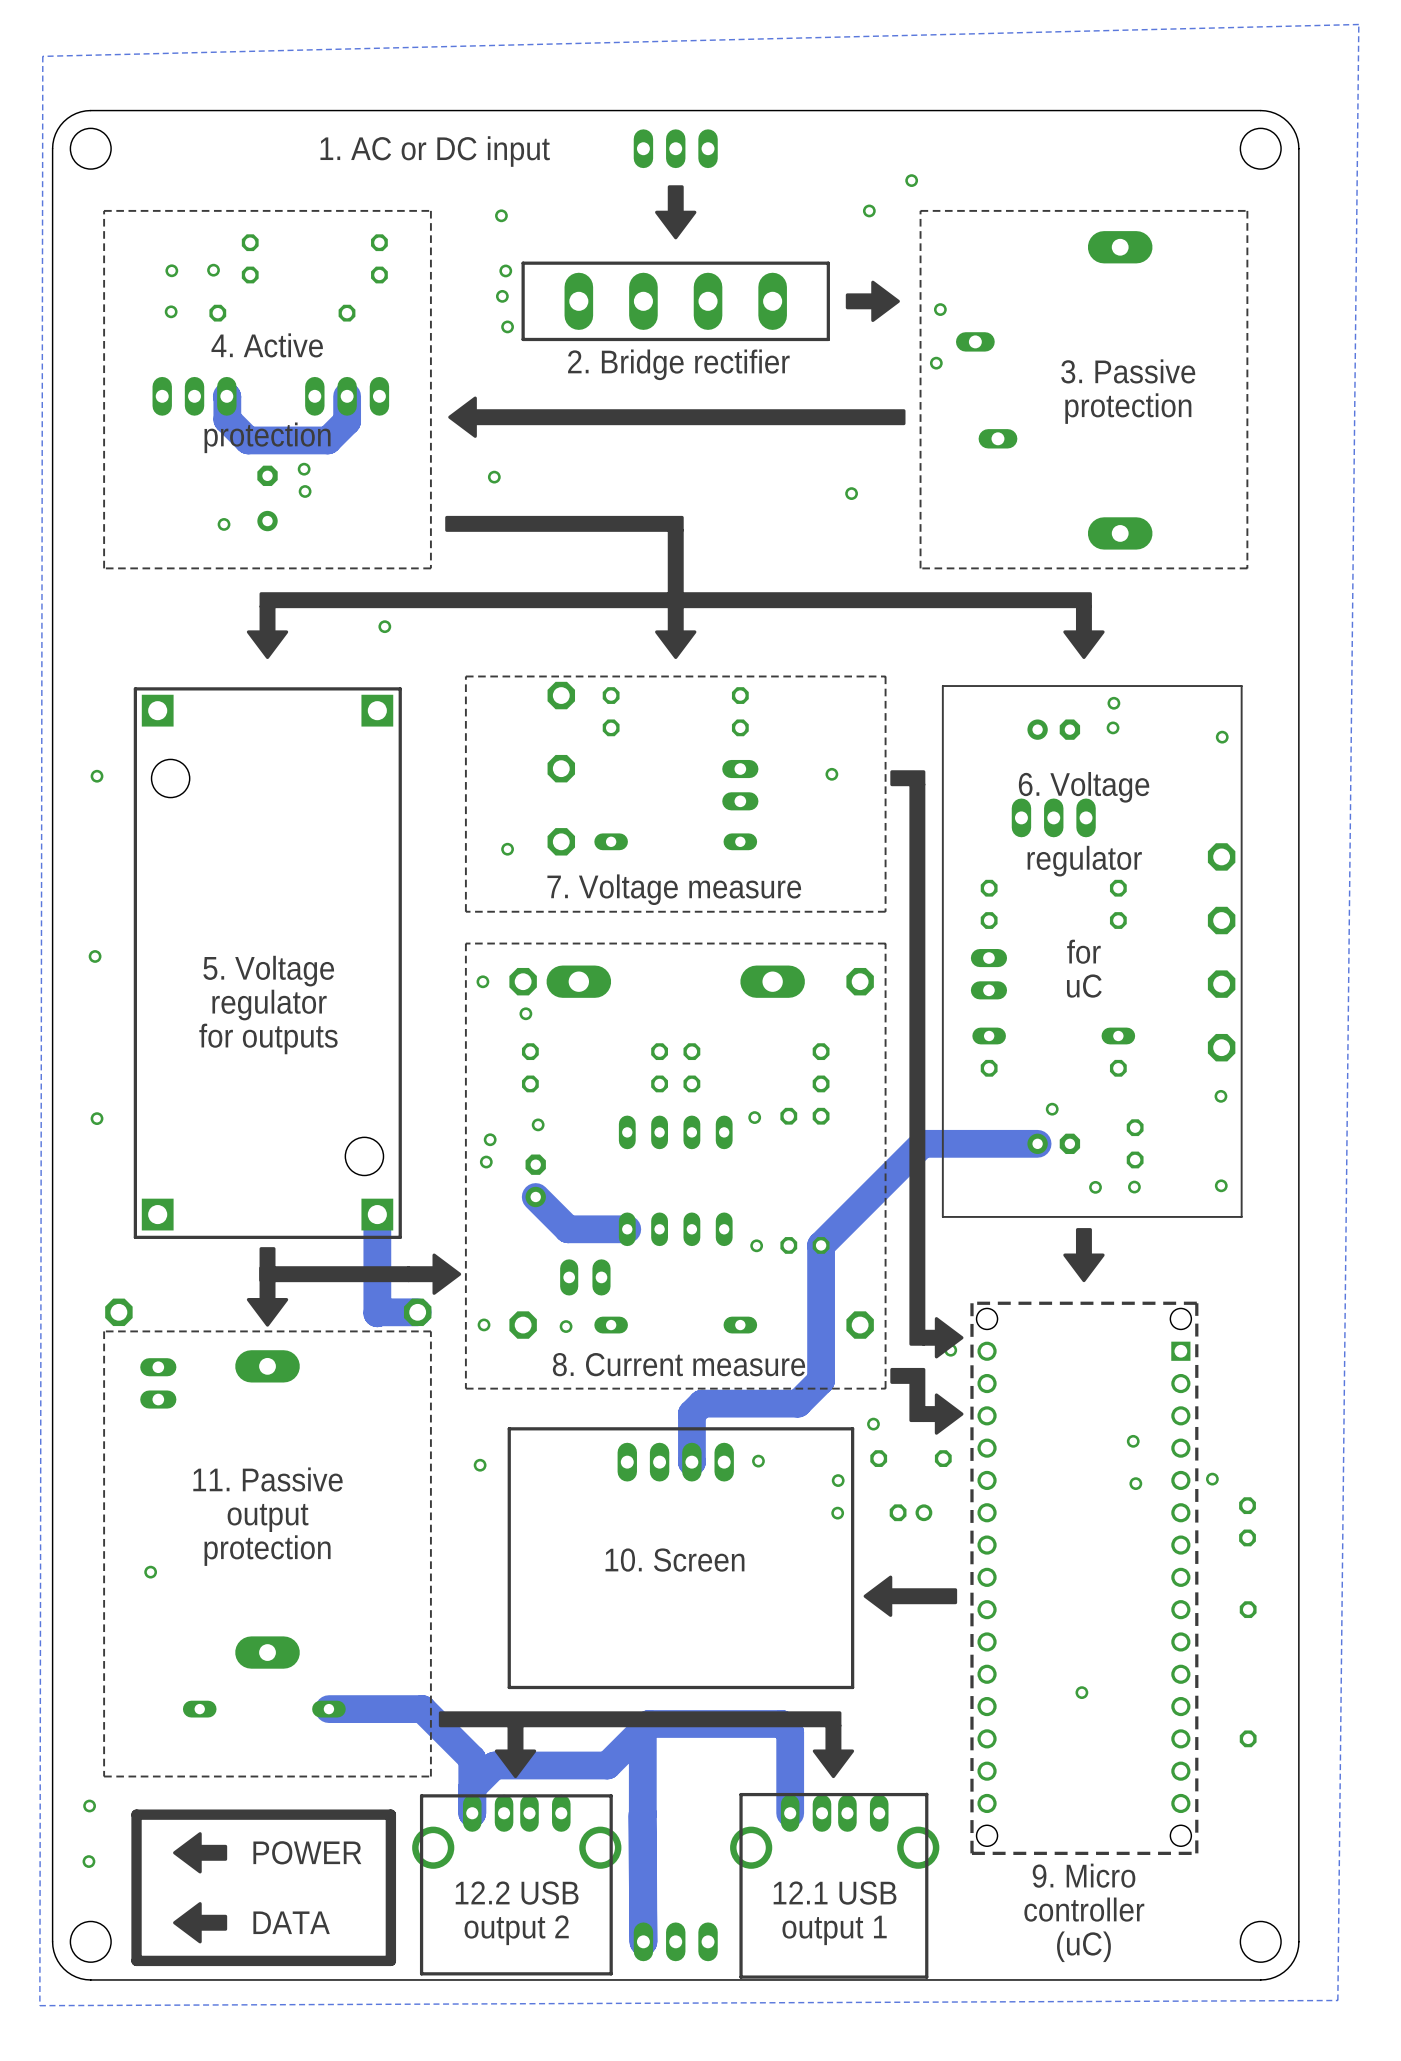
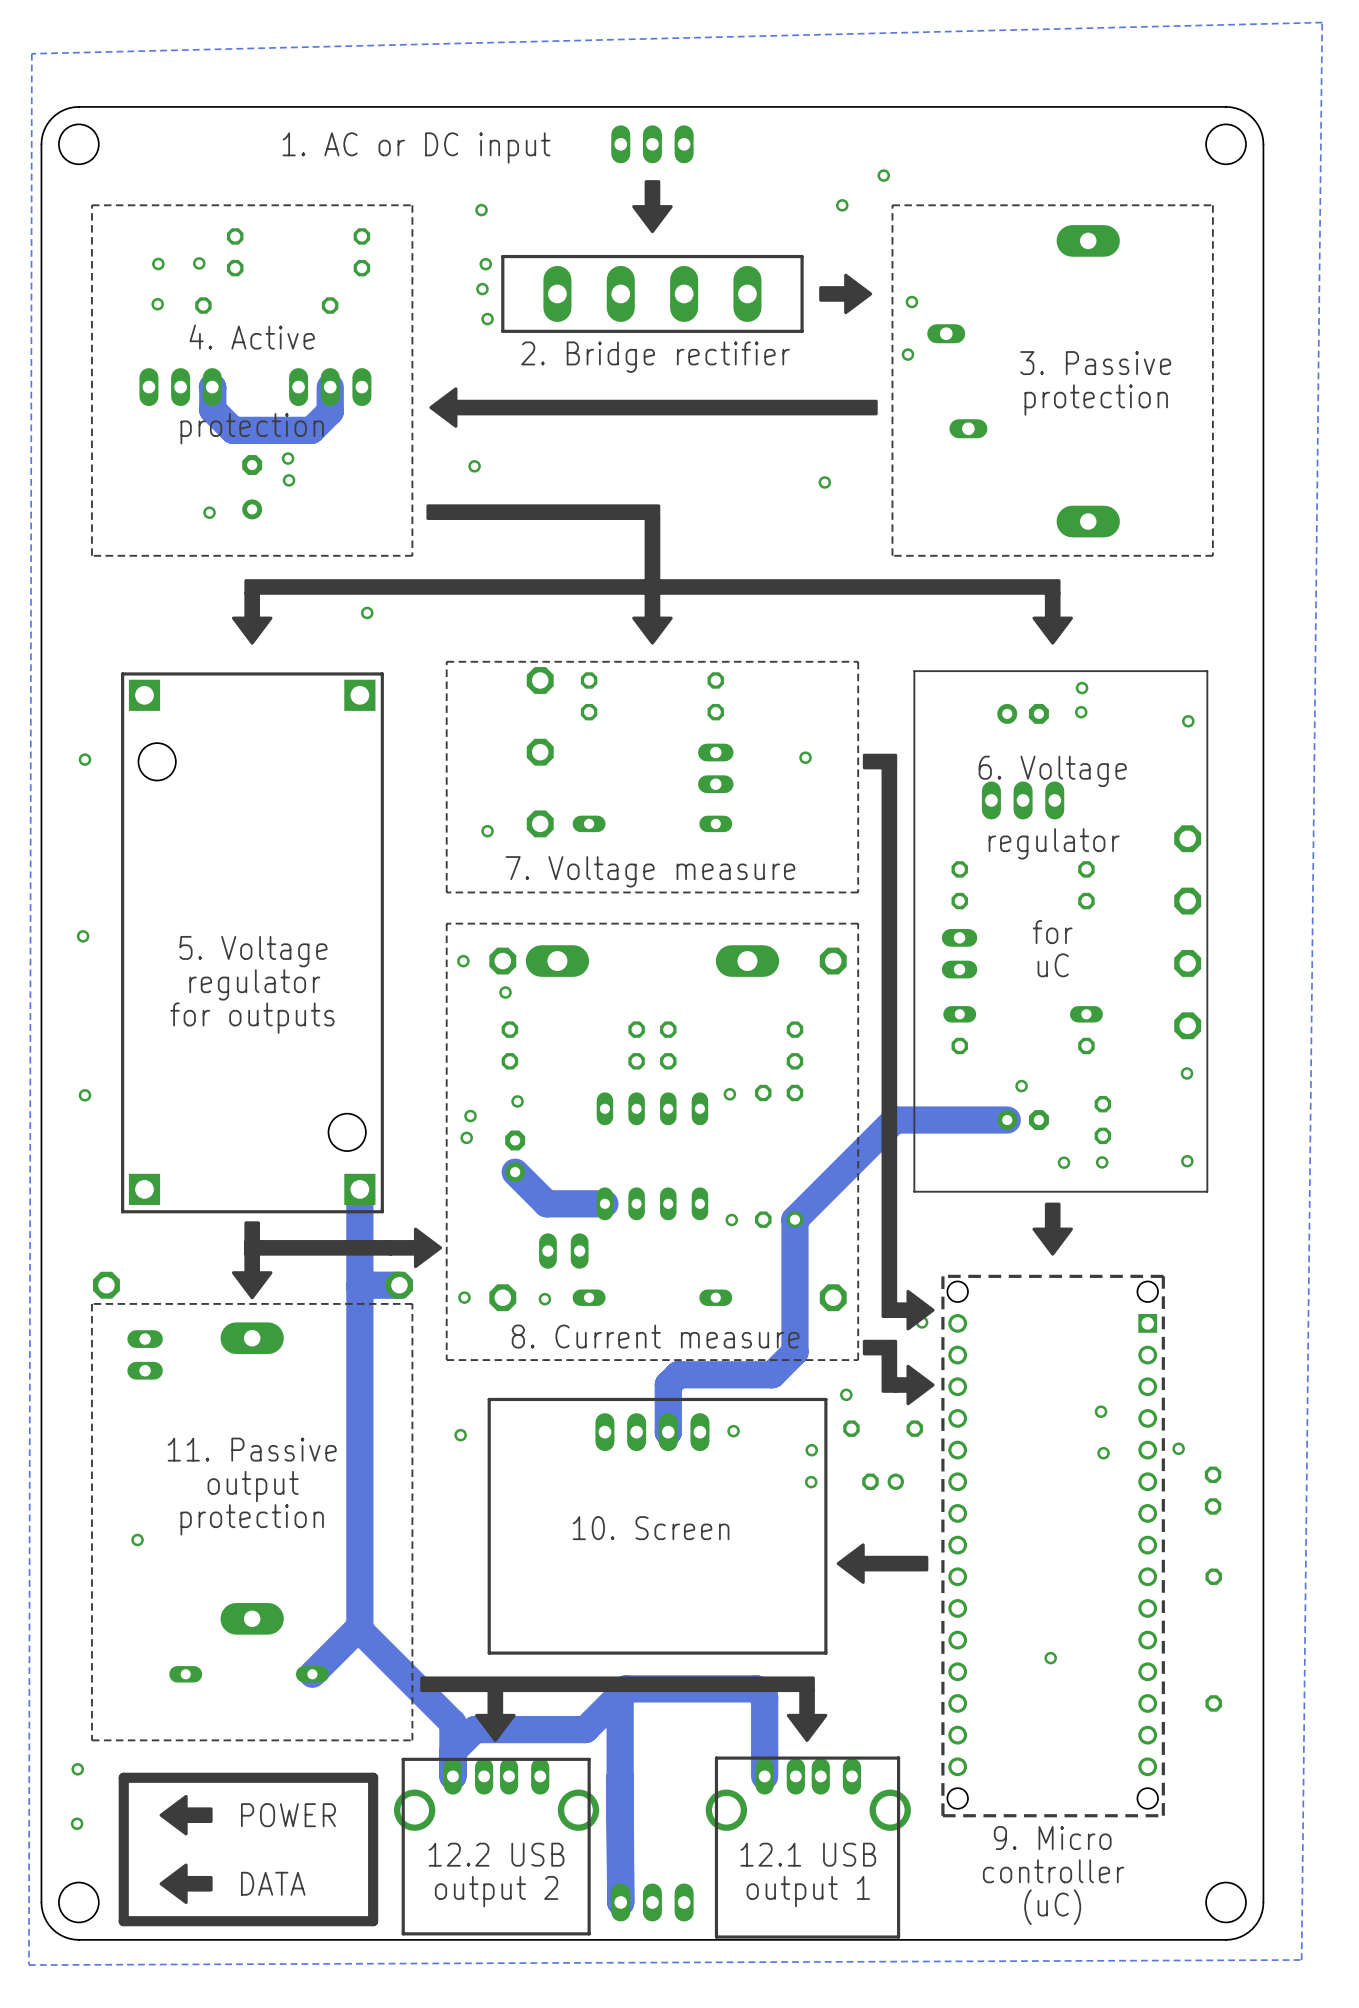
track: none -> (359, 1286) (359, 1630) (404, 1674)
track: (422, 1709) (328, 1709) -> (359, 1626) (312, 1674)

